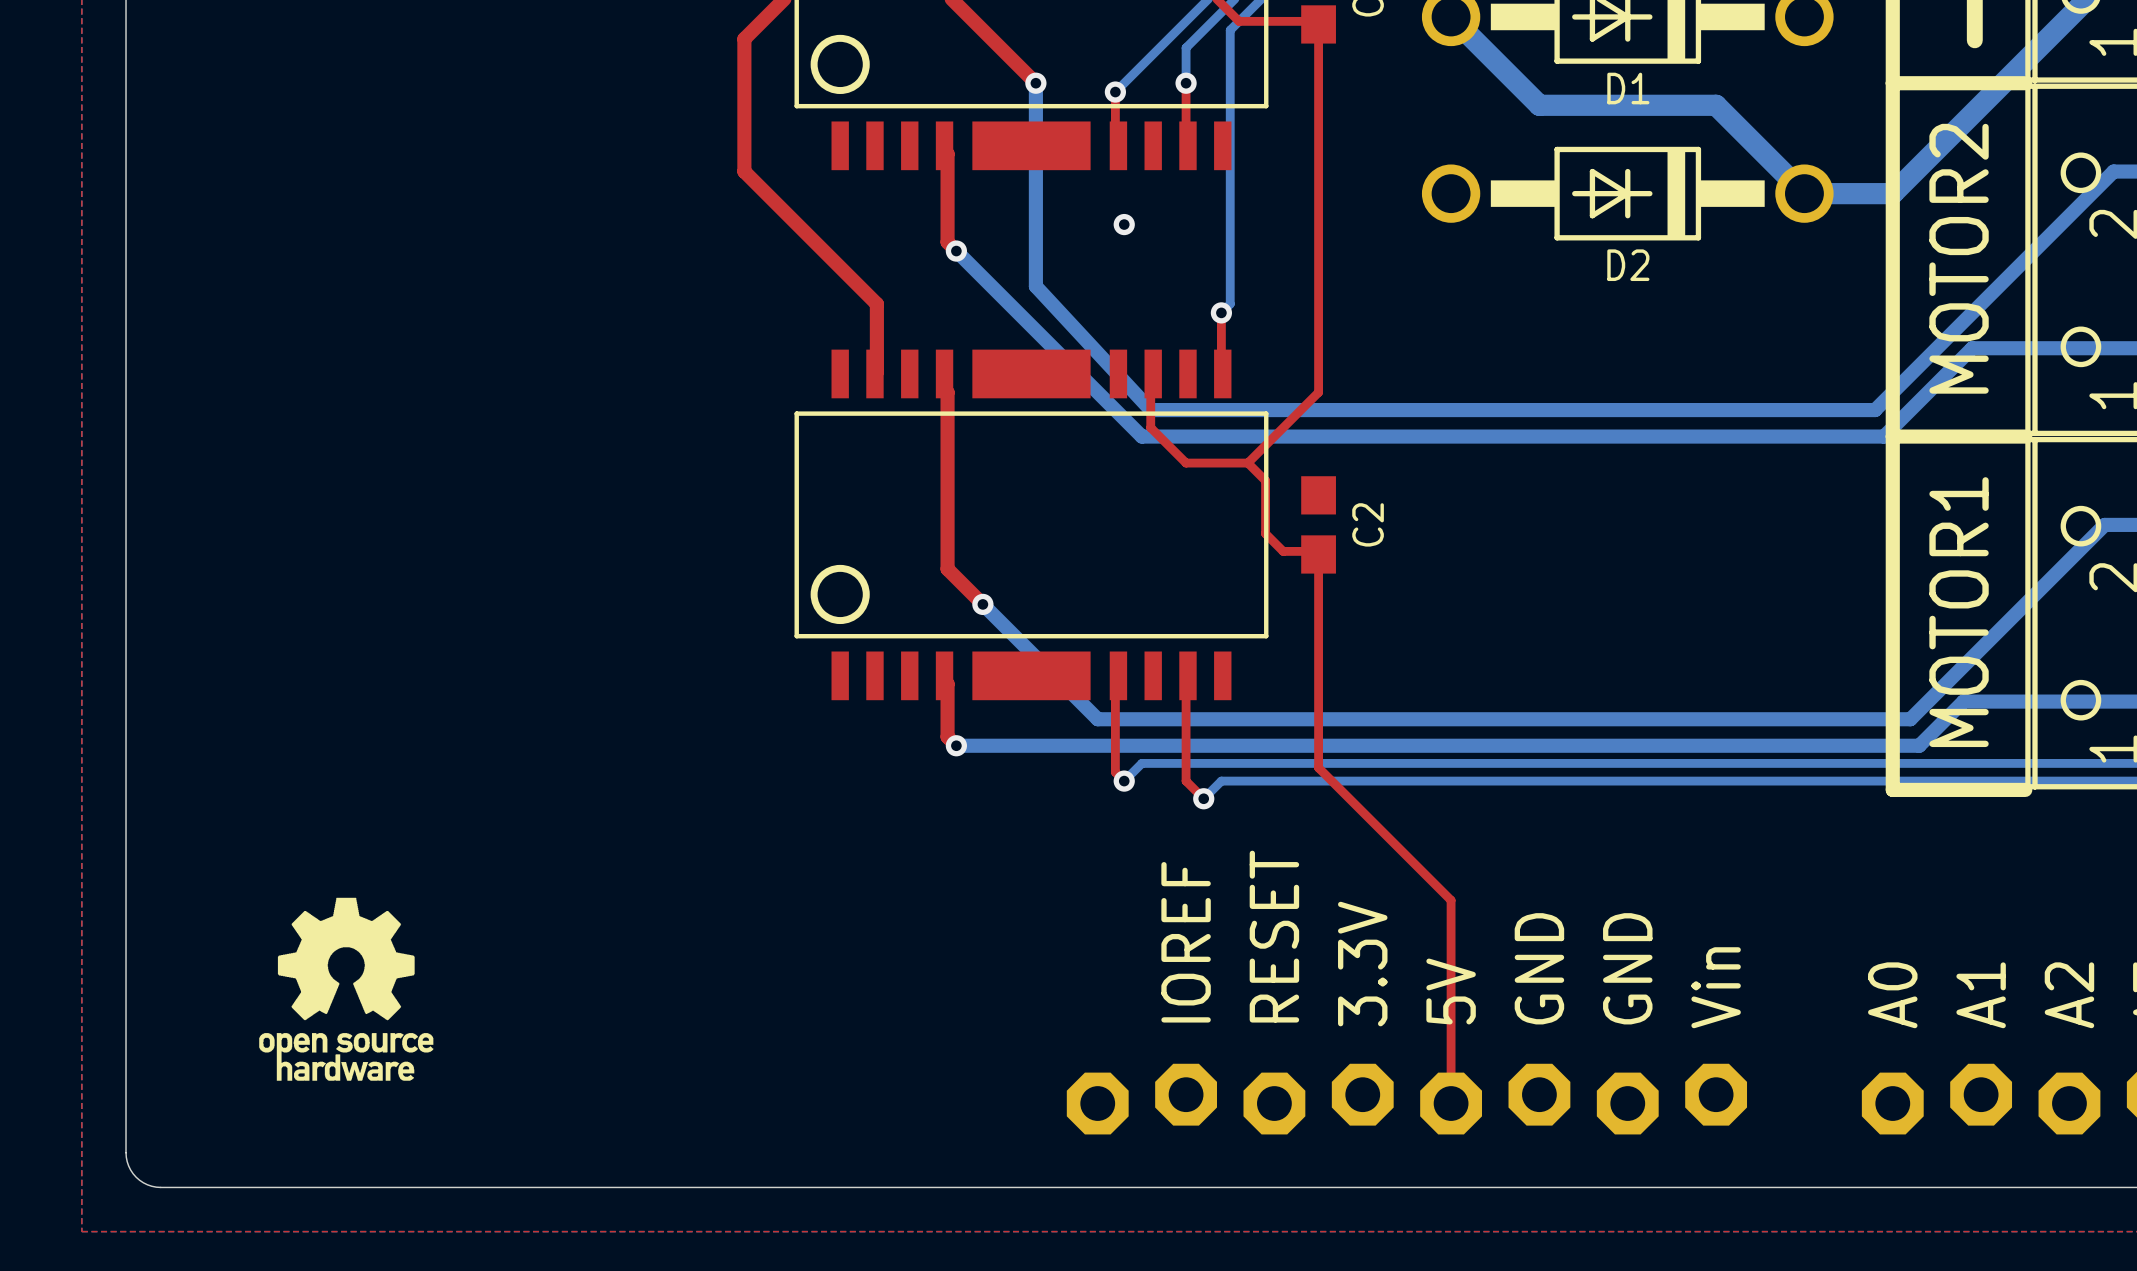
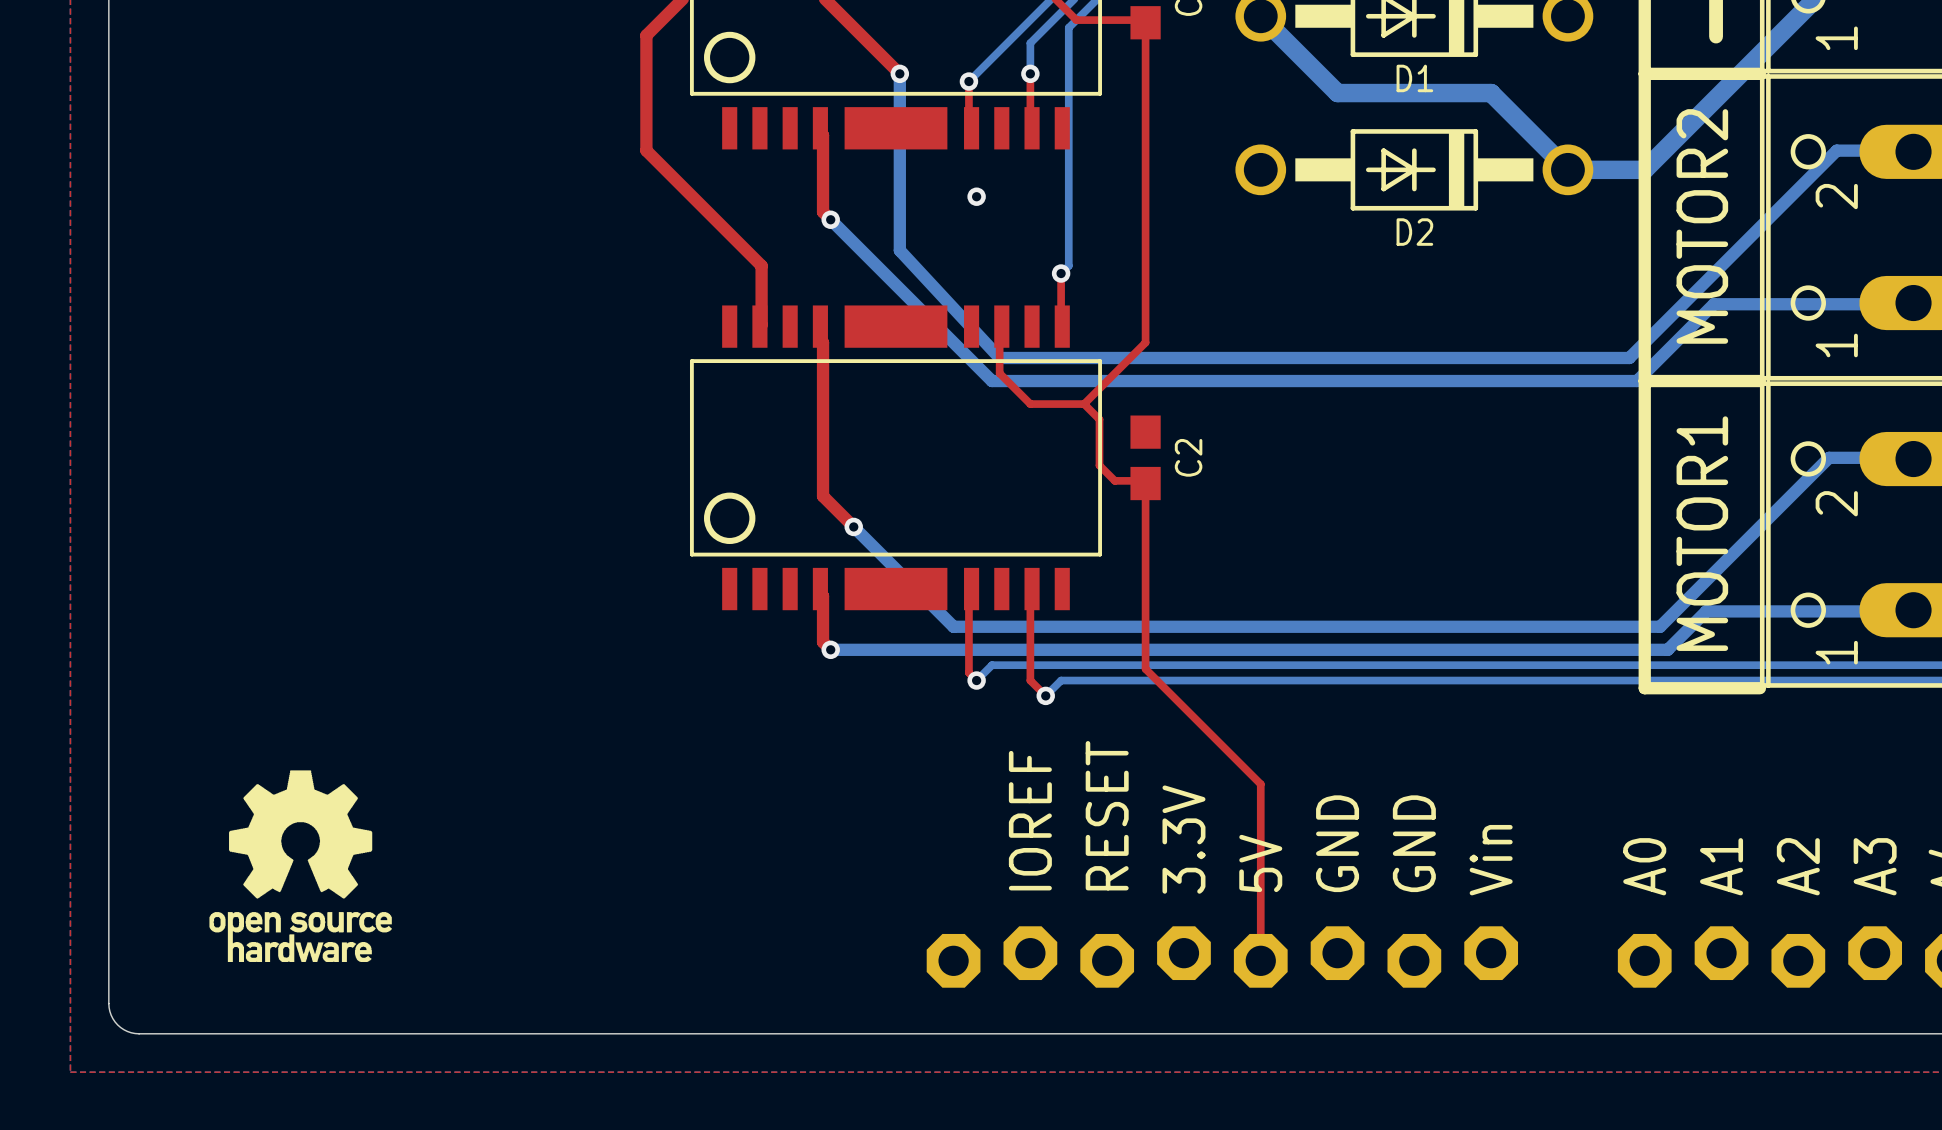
drawing shape: [259, 897, 434, 1081] -> [209, 770, 392, 962]

